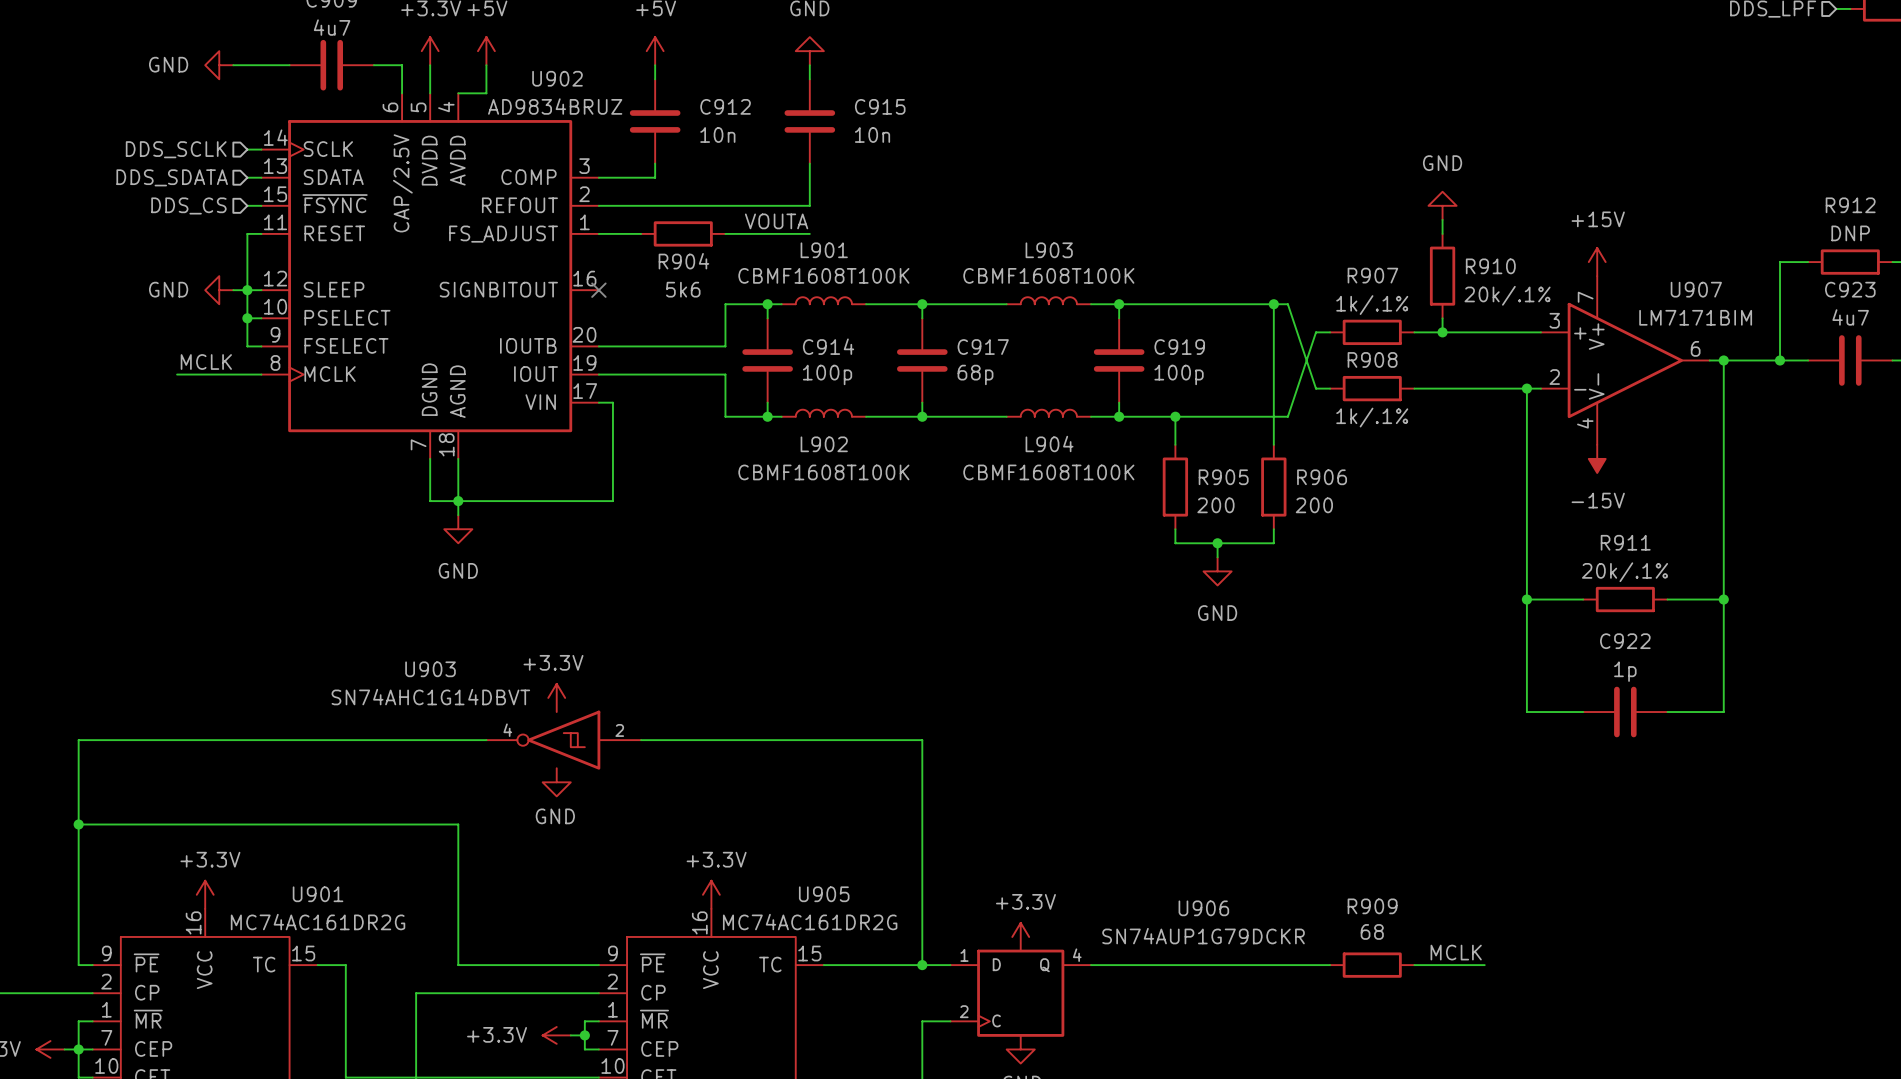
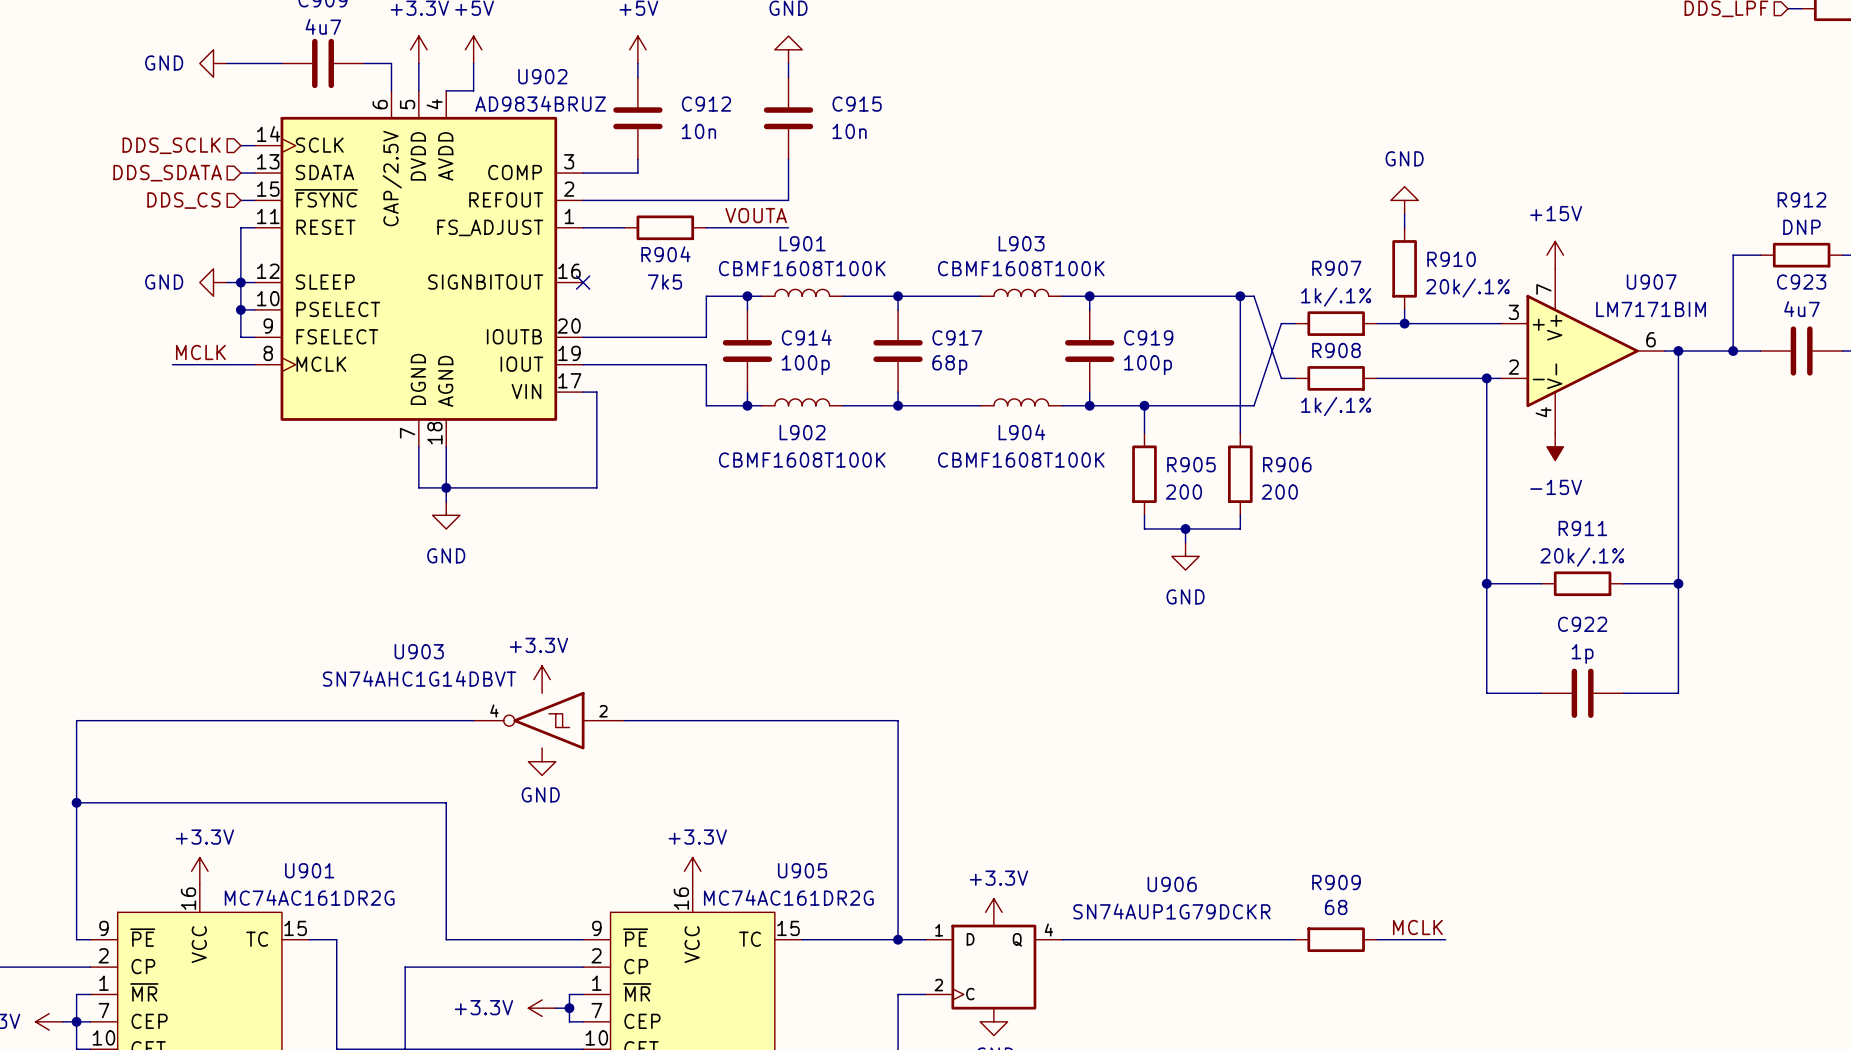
R904 value: 5k6 (683, 289) -> 7k5 (664, 282)

